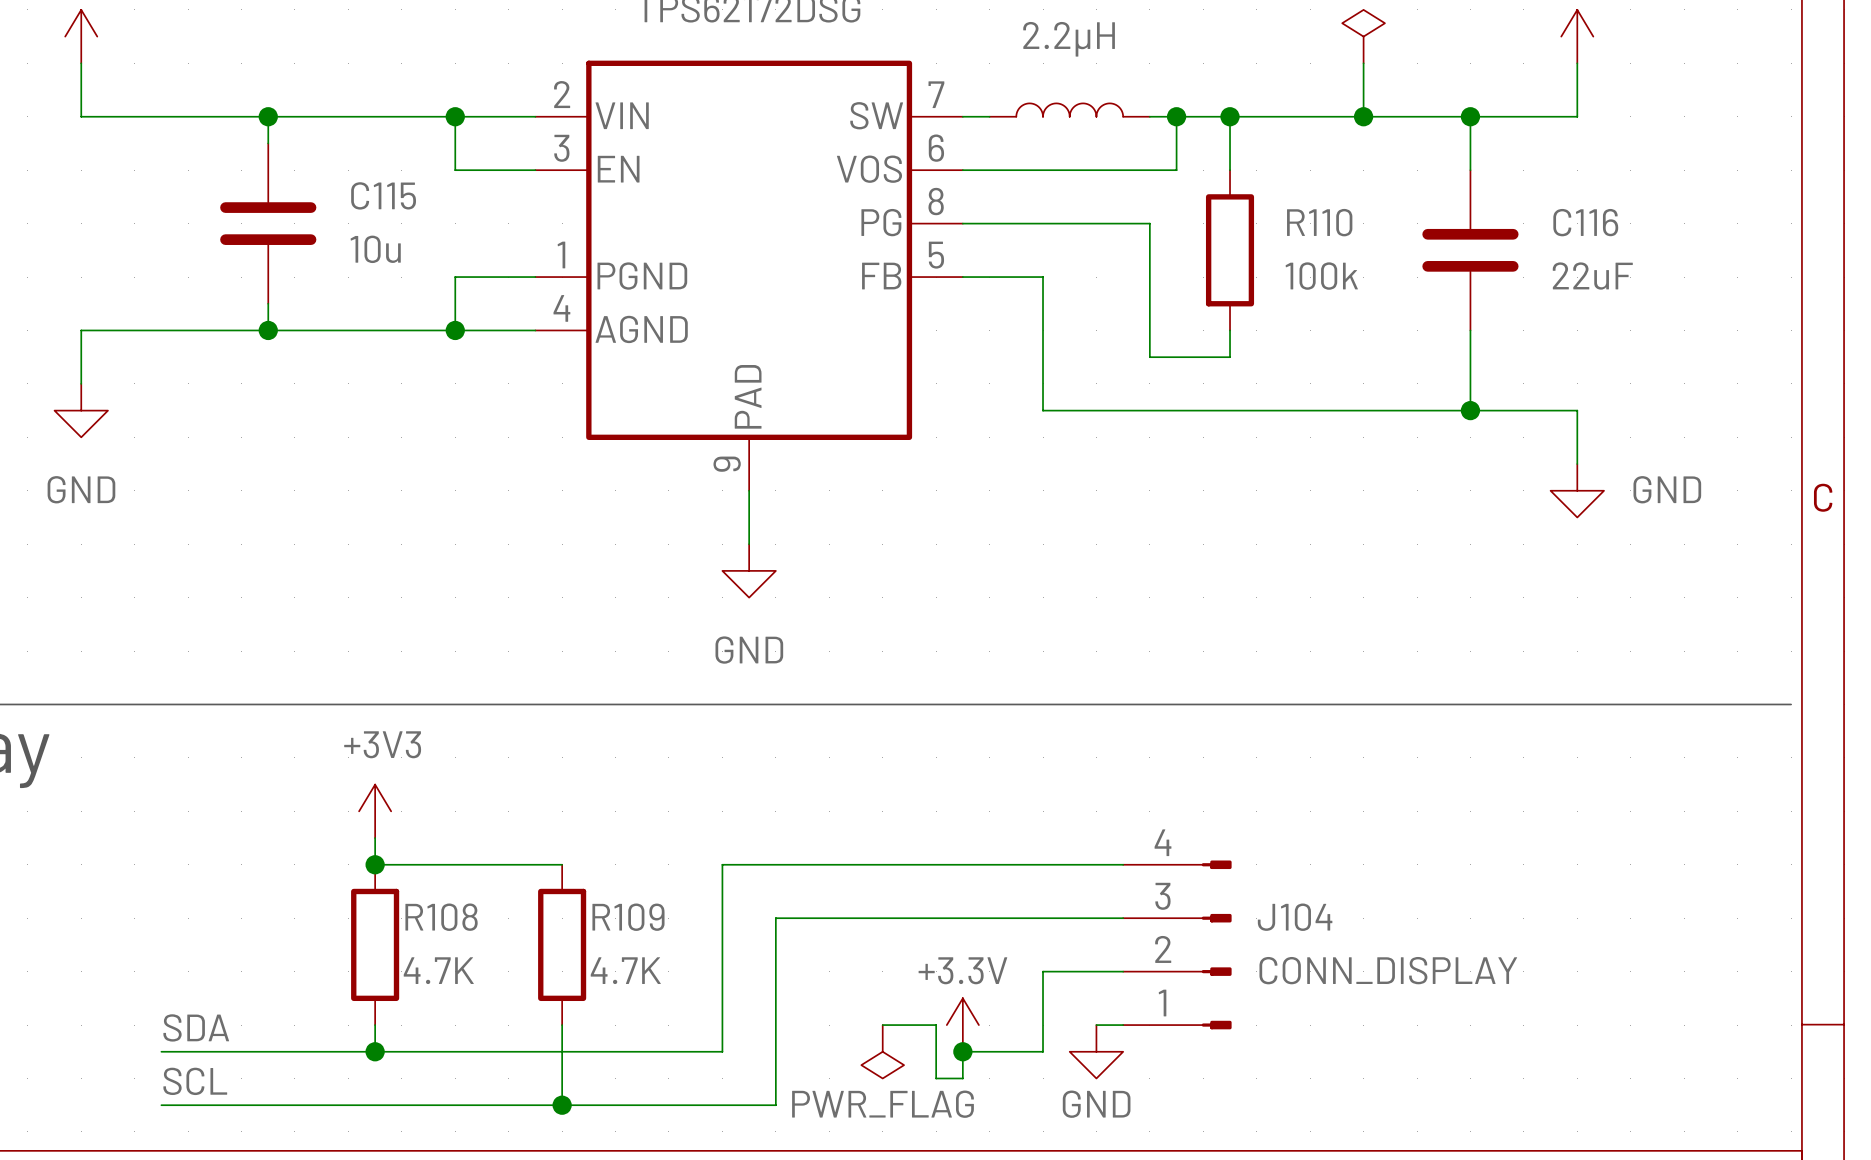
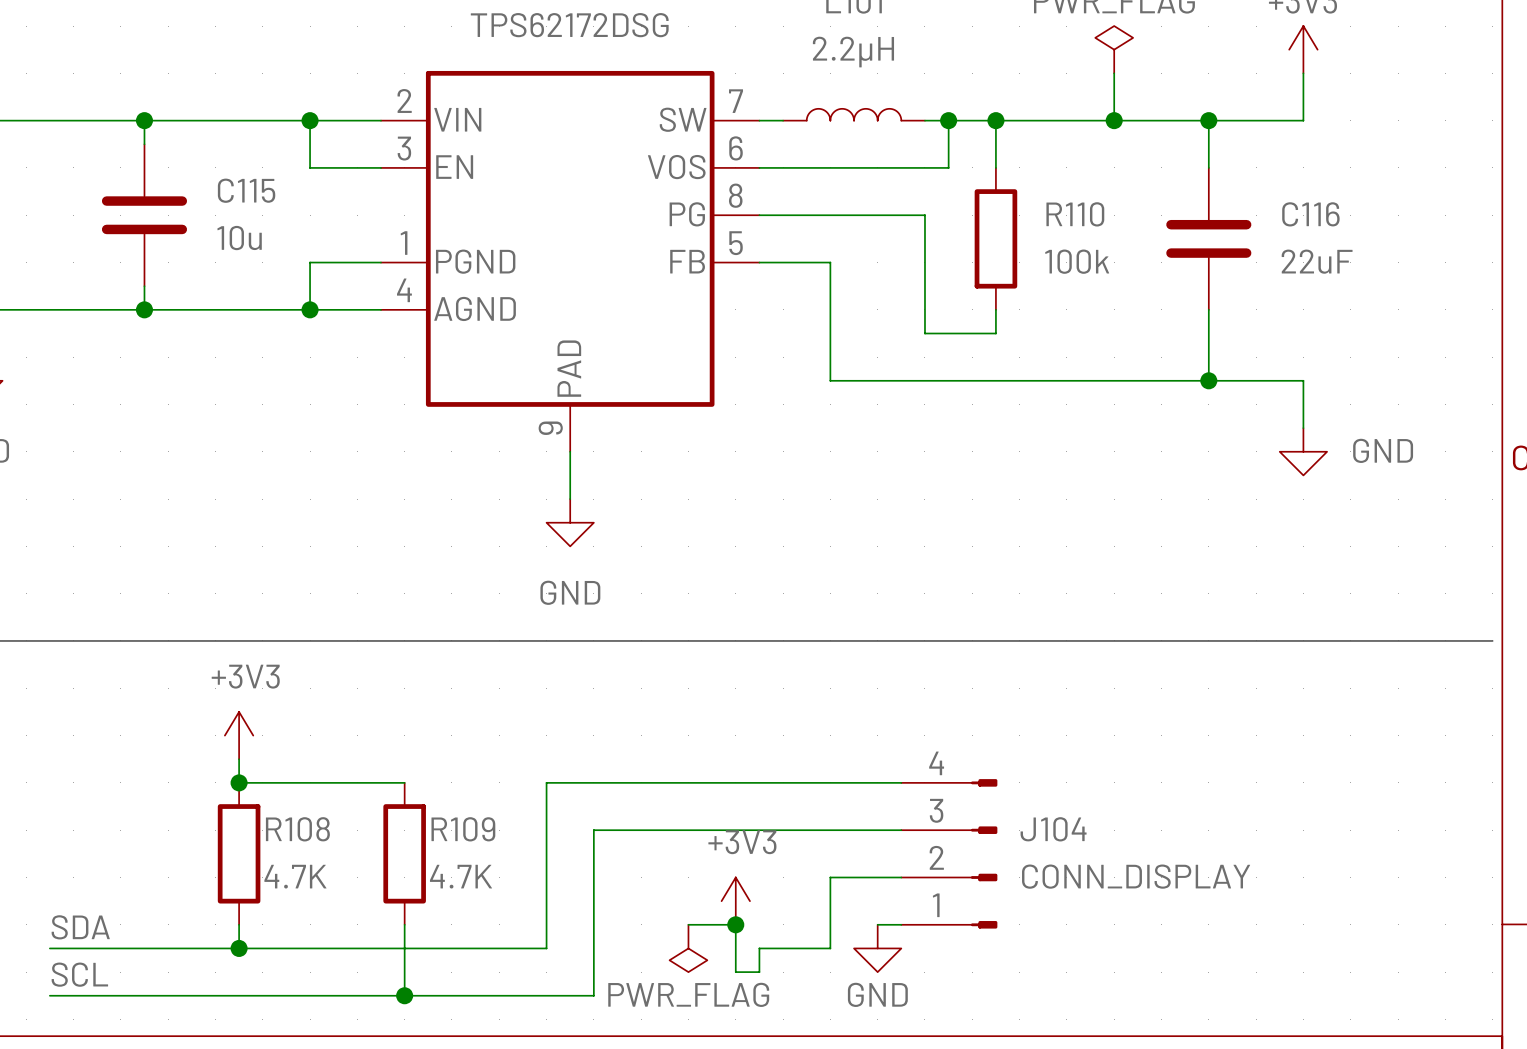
power symbol: none -> +3V3 (735, 901)
power symbol: +3.3V (962, 1025) -> none
junction position: (962, 1051) -> (735, 924)

